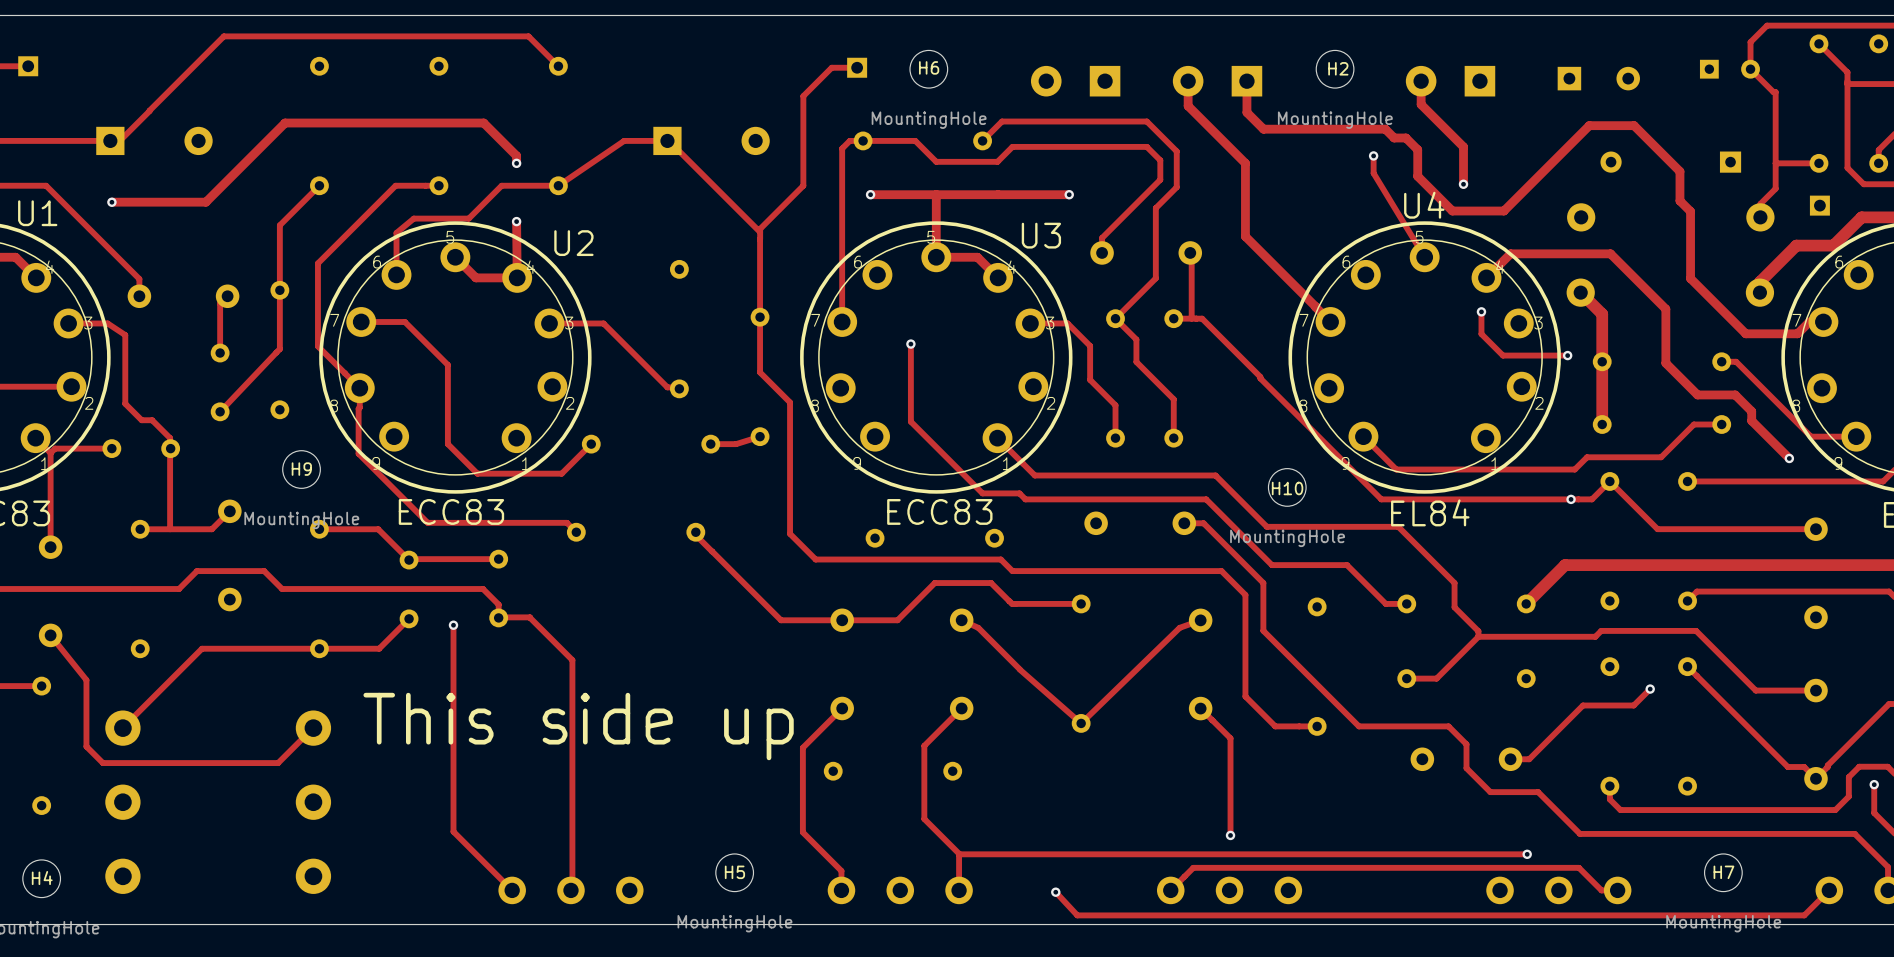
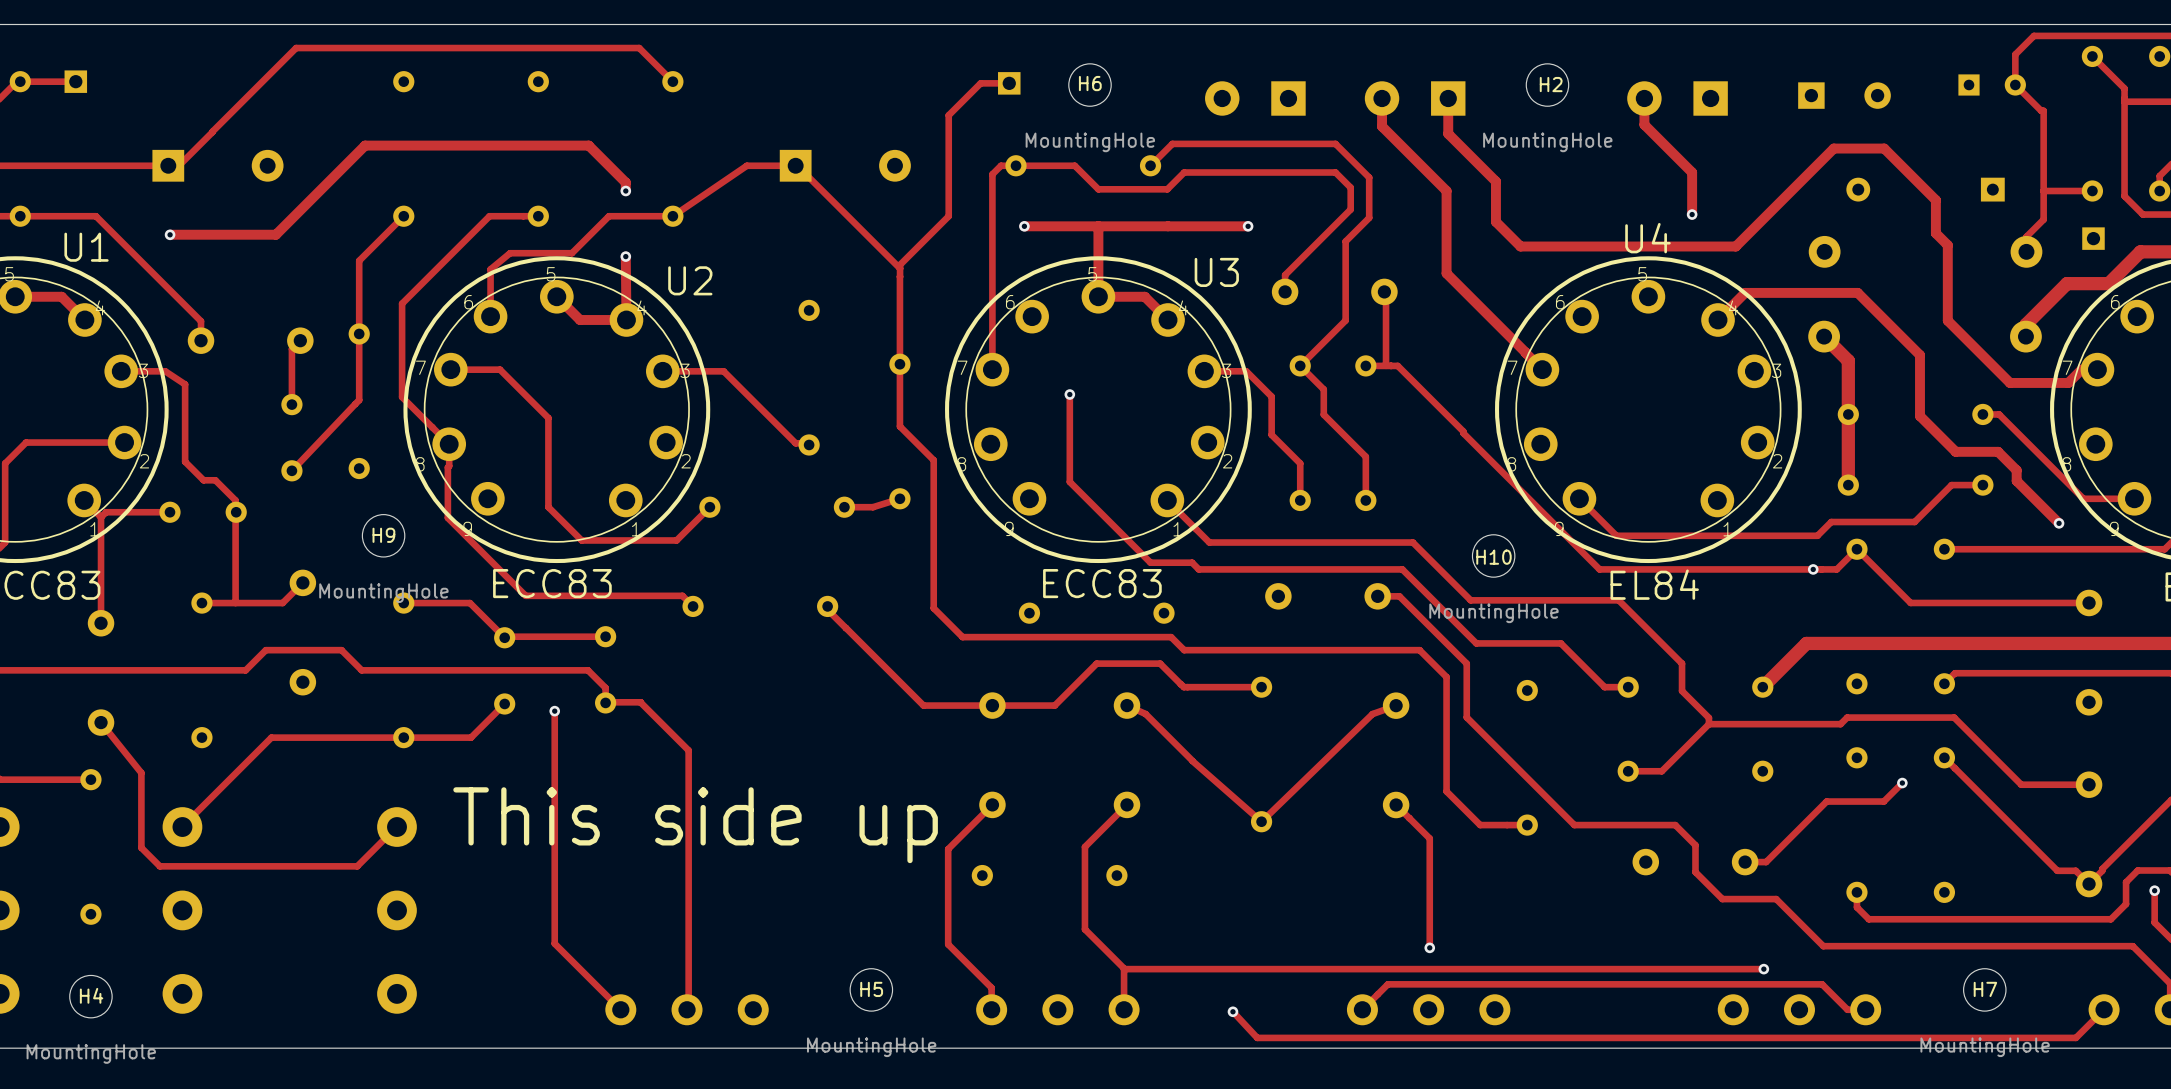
track: (1263, 129) (1385, 129) (1394, 137) (1405, 137) (1417, 149) (1417, 176) (1452, 211) (1503, 211) -> (1466, 152) (1495, 181) (1495, 221) (1520, 246) (1735, 246) (1737, 244)
track: (1373, 155) (1373, 173) (1424, 257) -> none
via: (1373, 155) -> none
track: (1481, 311) (1481, 334) (1502, 355) (1567, 355) -> none
via: (1481, 311) -> none
via: (1567, 355) -> none

